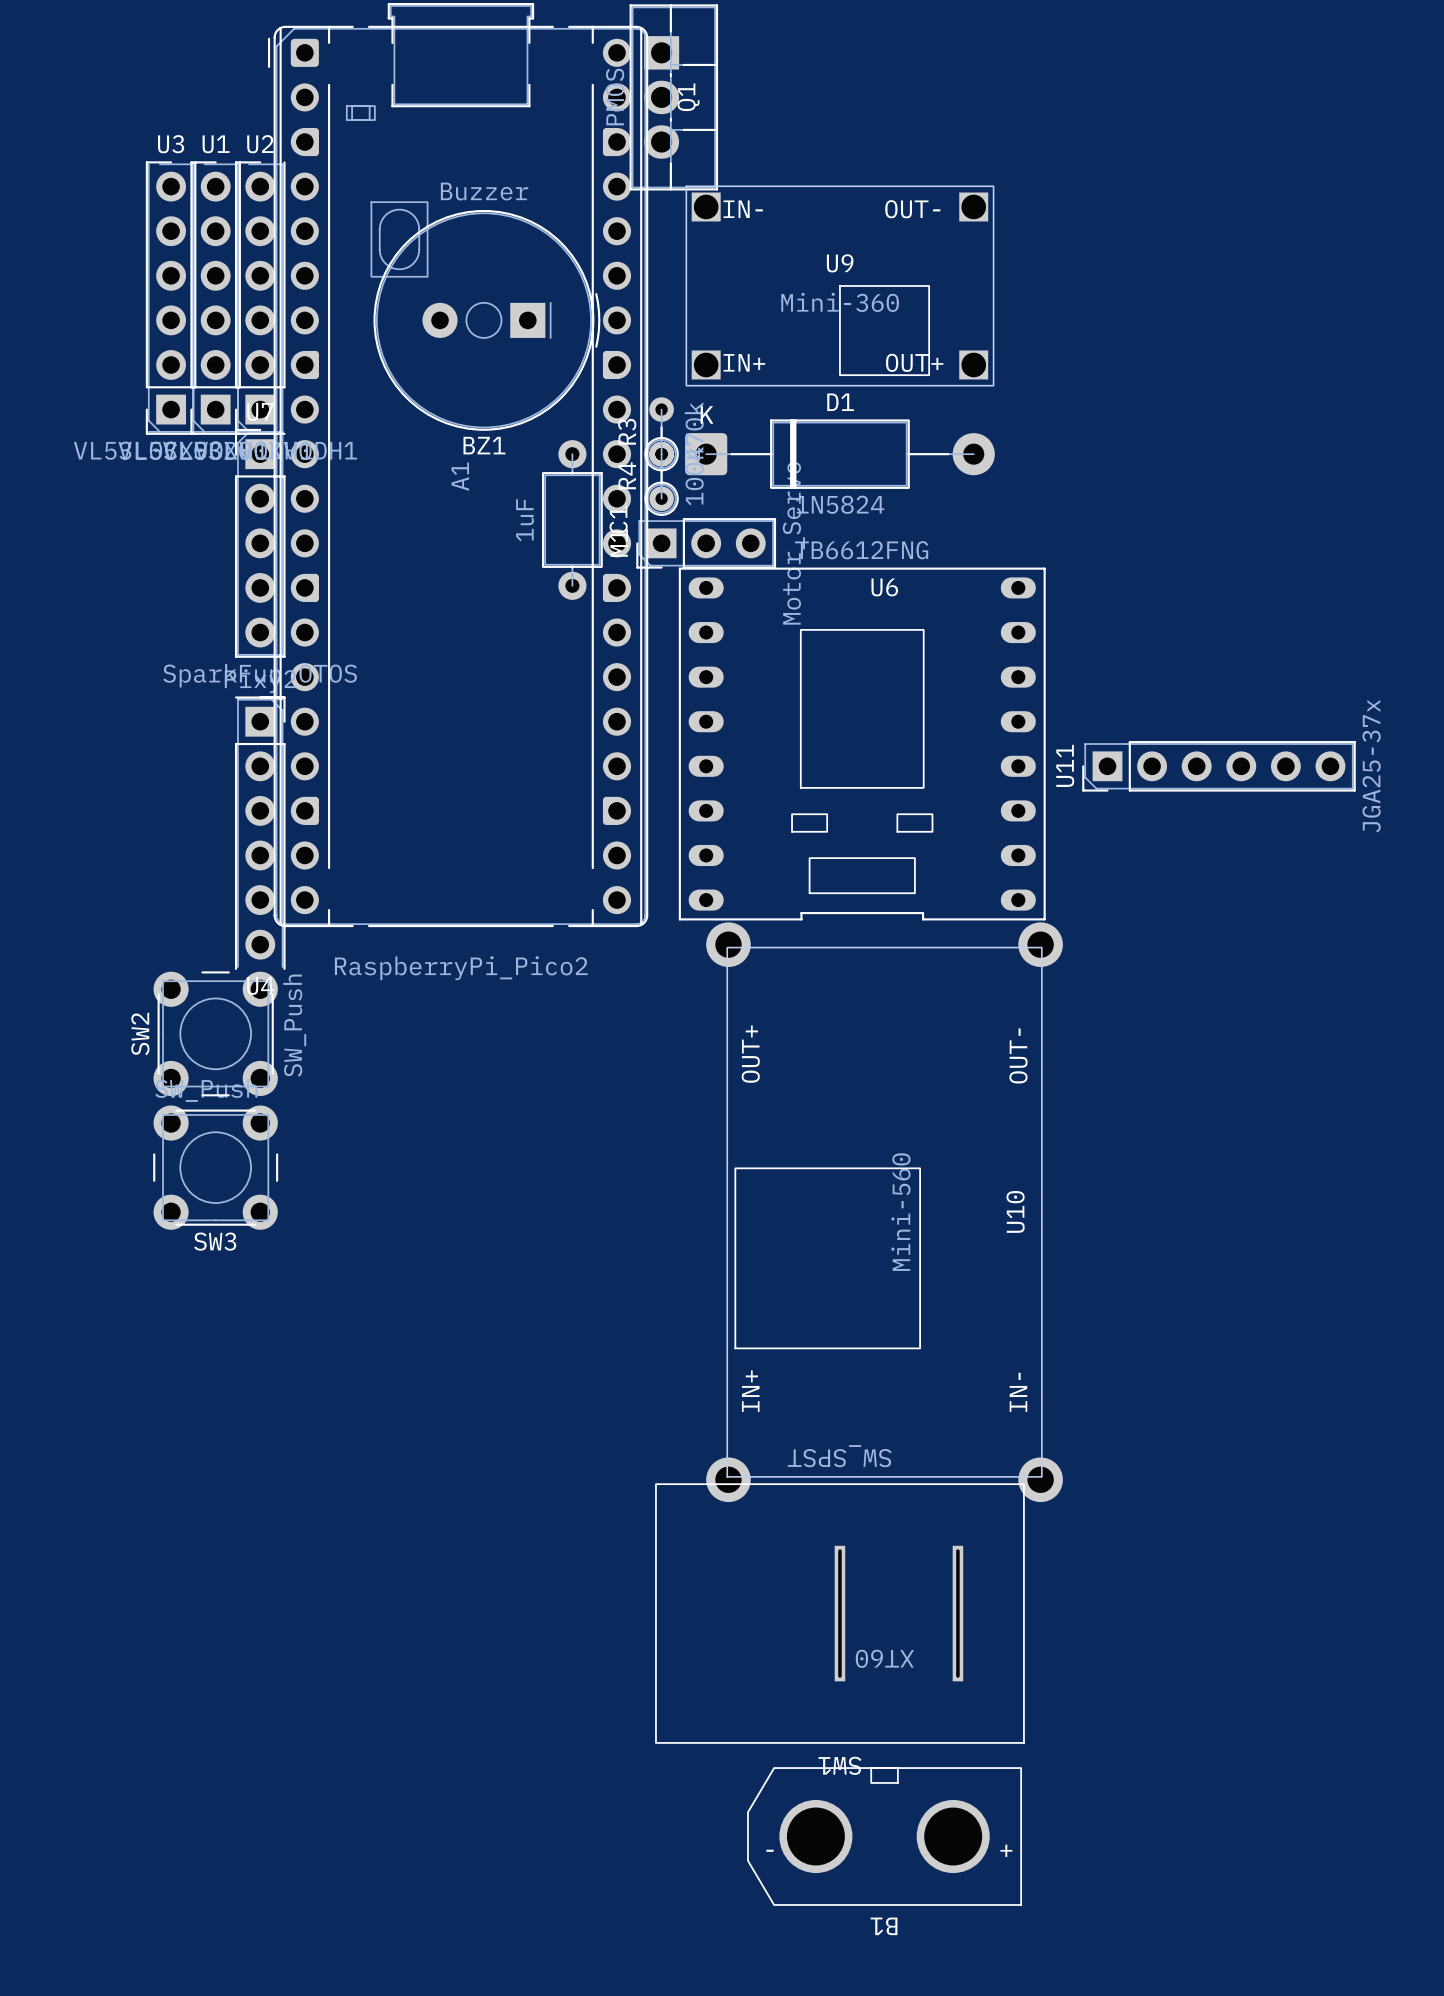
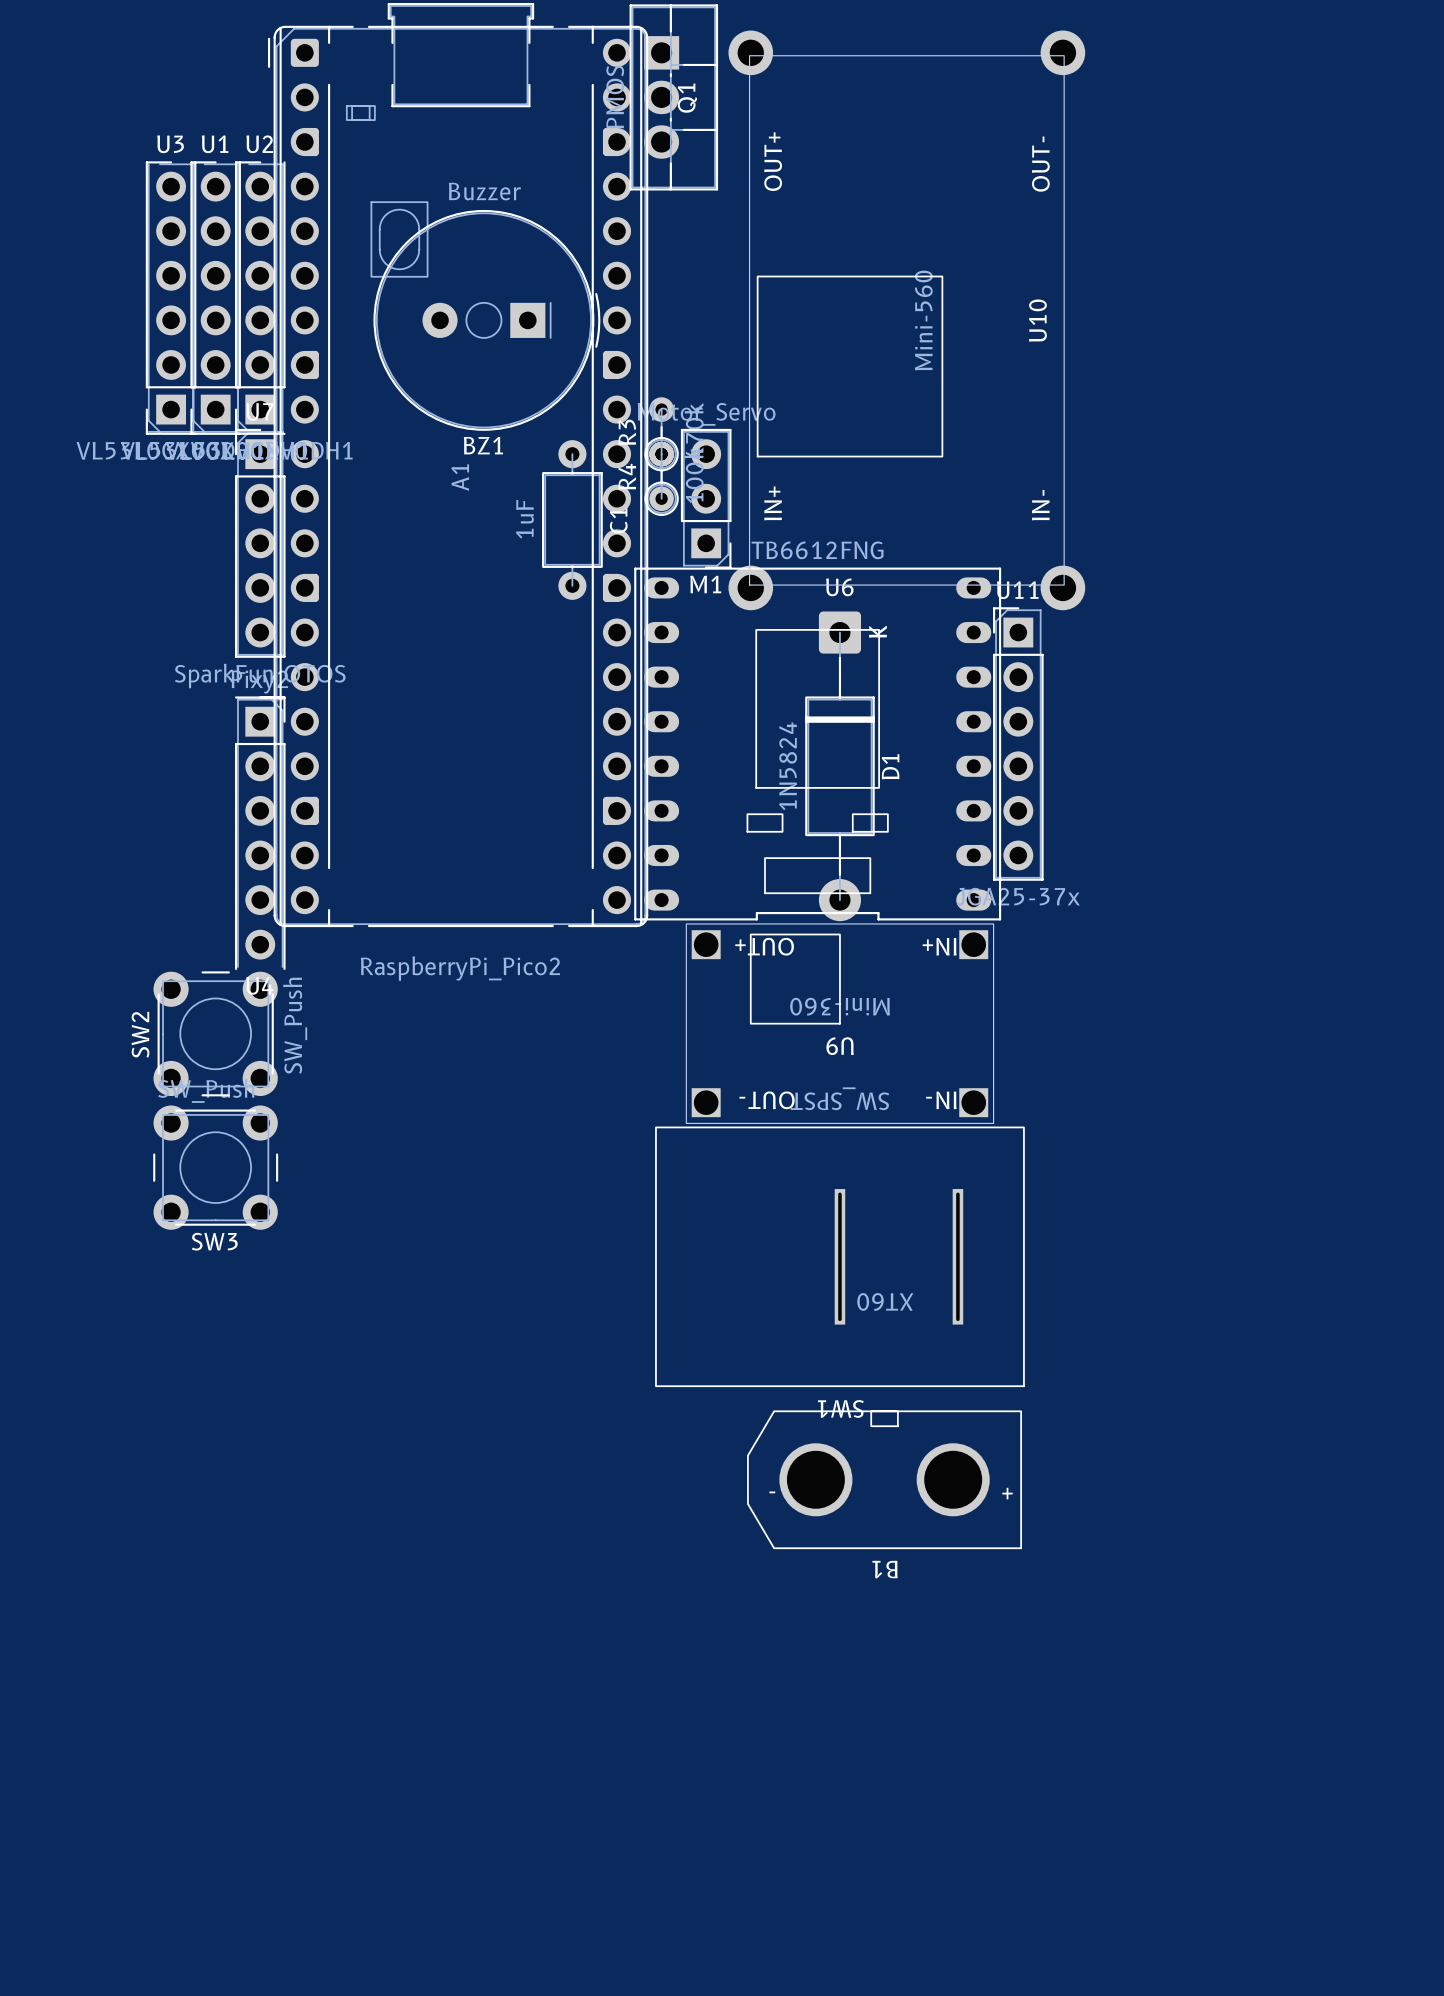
U9 rotation: 0° (839, 285) -> 180° (839, 1023)
U9 position: (839, 285) -> (839, 1023)
D1 rotation: 0° (839, 454) -> 90° clockwise (839, 766)
D1 position: (839, 454) -> (839, 766)
M1 rotation: 0° (706, 543) -> 90° counterclockwise (706, 498)
U6 position: (862, 744) -> (817, 744)
U11 rotation: 0° (1218, 766) -> 90° clockwise (1018, 744)
U11 position: (1218, 766) -> (1018, 744)
U10 position: (884, 1212) -> (906, 320)
SW1 position: (839, 1613) -> (839, 1256)
B1 position: (884, 1836) -> (884, 1479)

